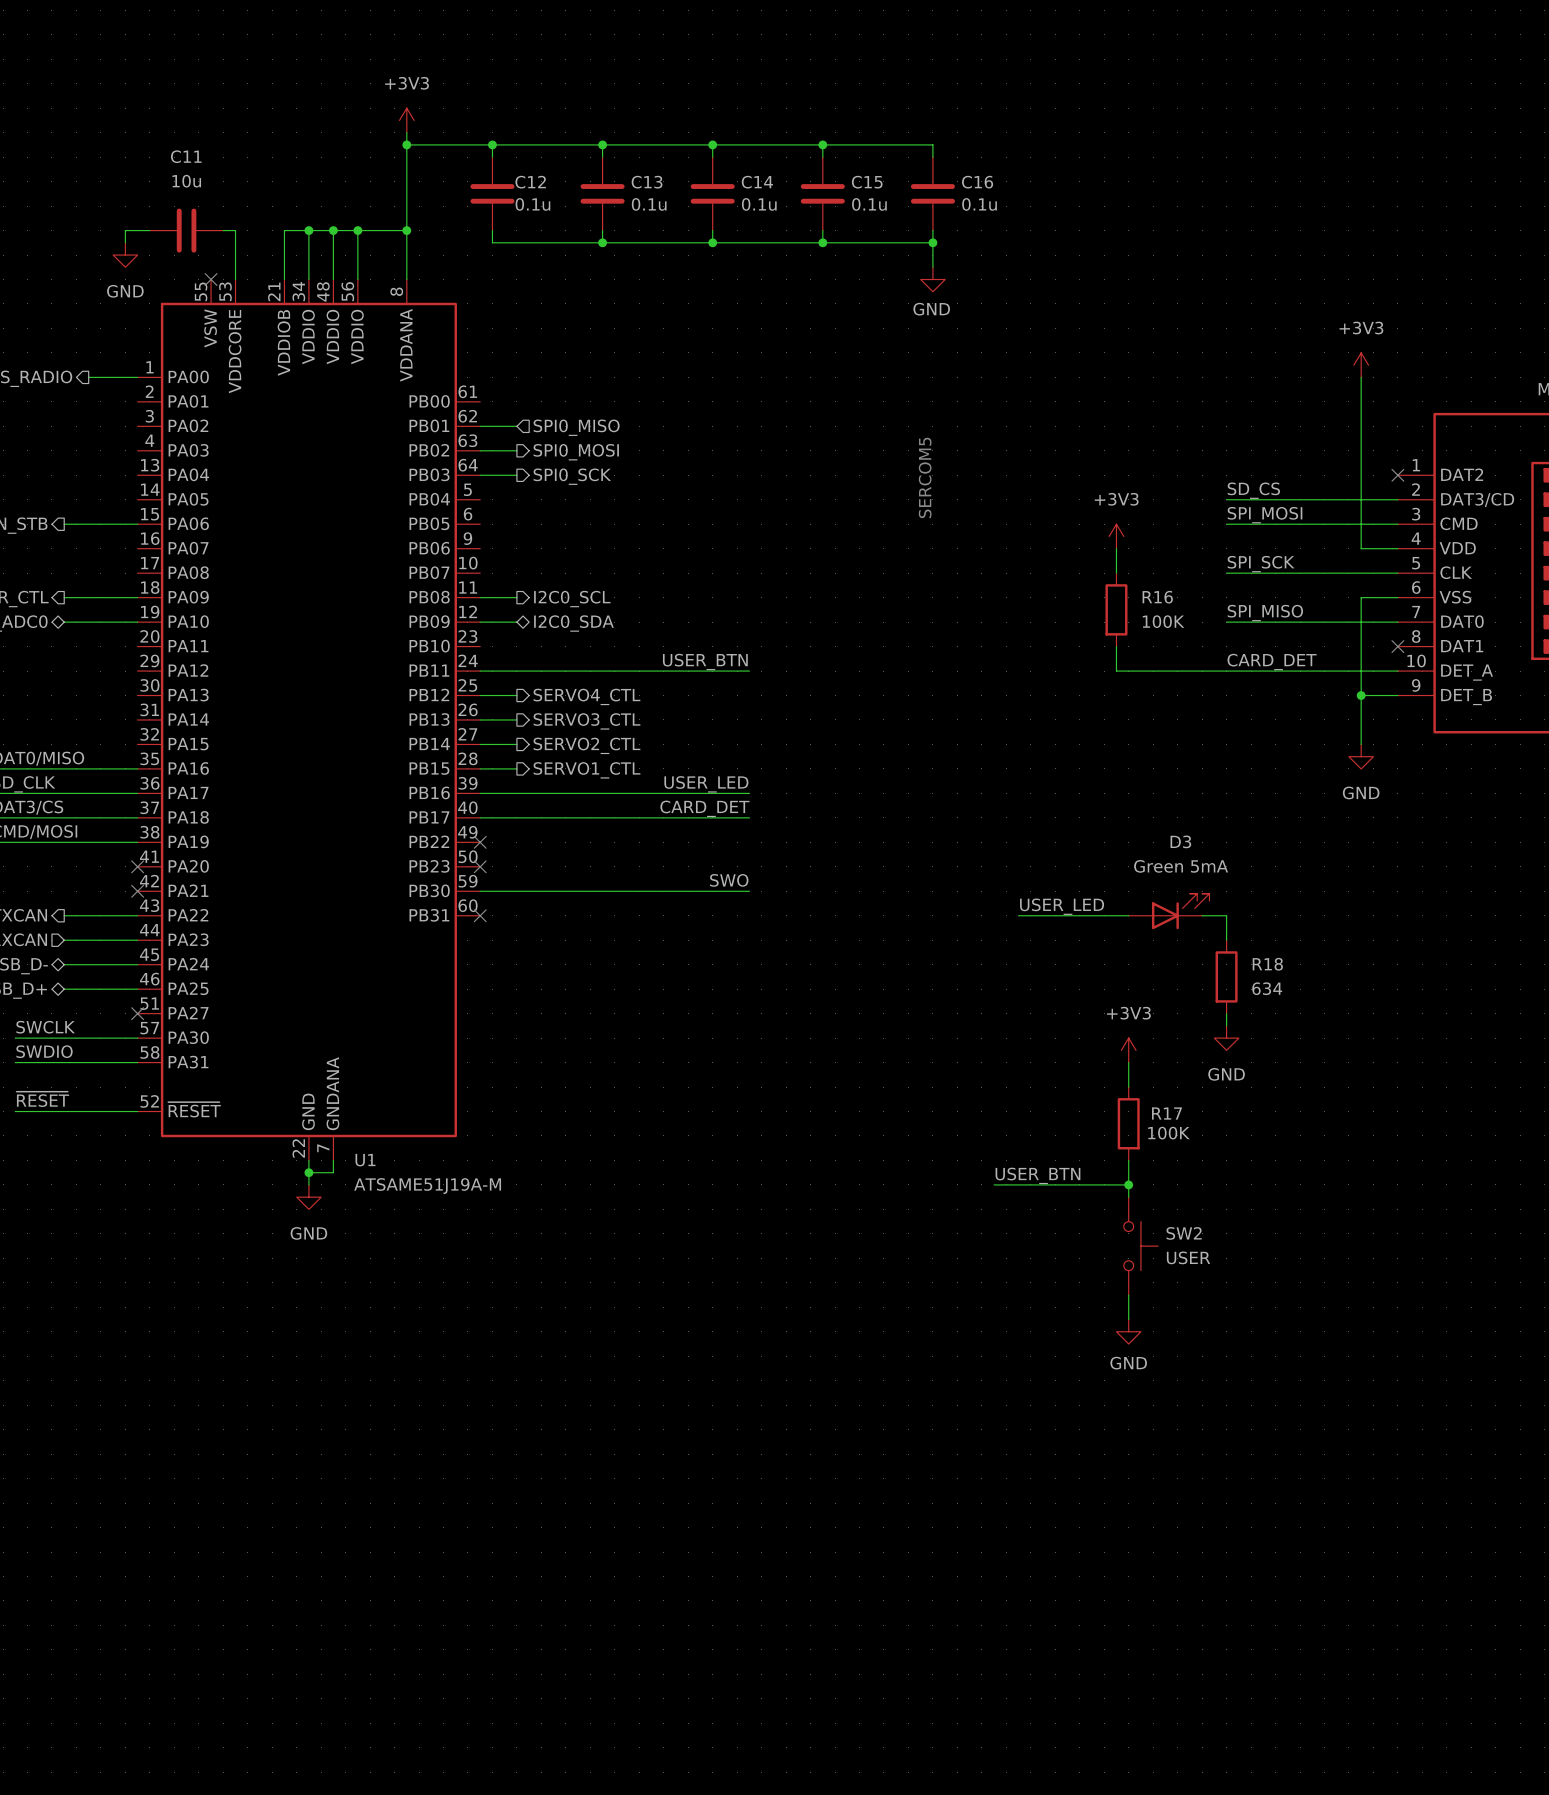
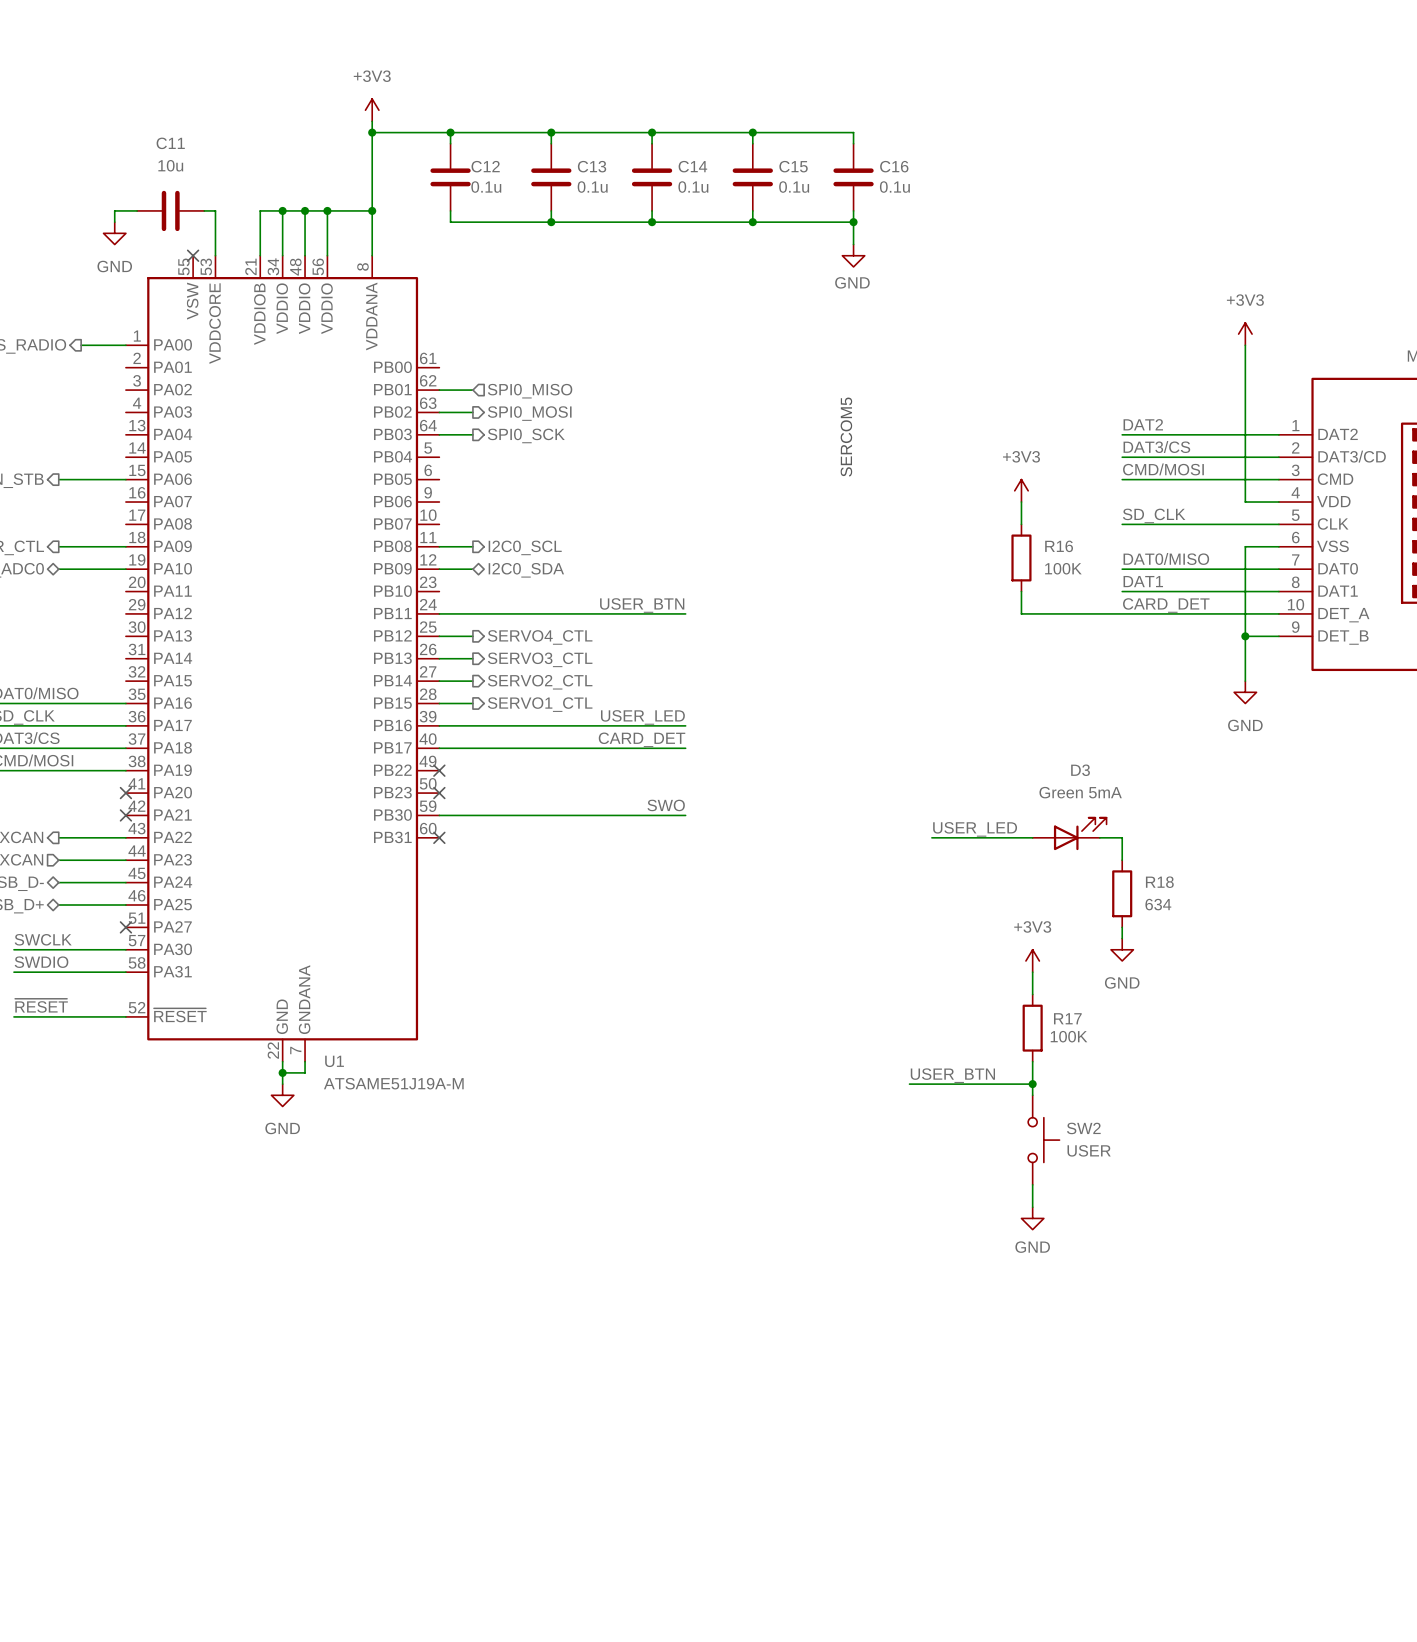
label: none -> DAT2 (1143, 424)
wire: none -> (1122, 434) (1278, 434)
no-connect mark: (1397, 475) -> none
label: SD_CS (1253, 490) -> DAT3/CS (1156, 447)
label: SPI_MOSI (1265, 515) -> CMD/MOSI (1163, 469)
label: SPI_SCK (1261, 564) -> SD_CLK (1154, 515)
label: SPI_MISO (1265, 613) -> DAT0/MISO (1166, 558)
label: none -> DAT1 (1143, 581)
wire: none -> (1122, 591) (1278, 591)
no-connect mark: (1397, 646) -> none

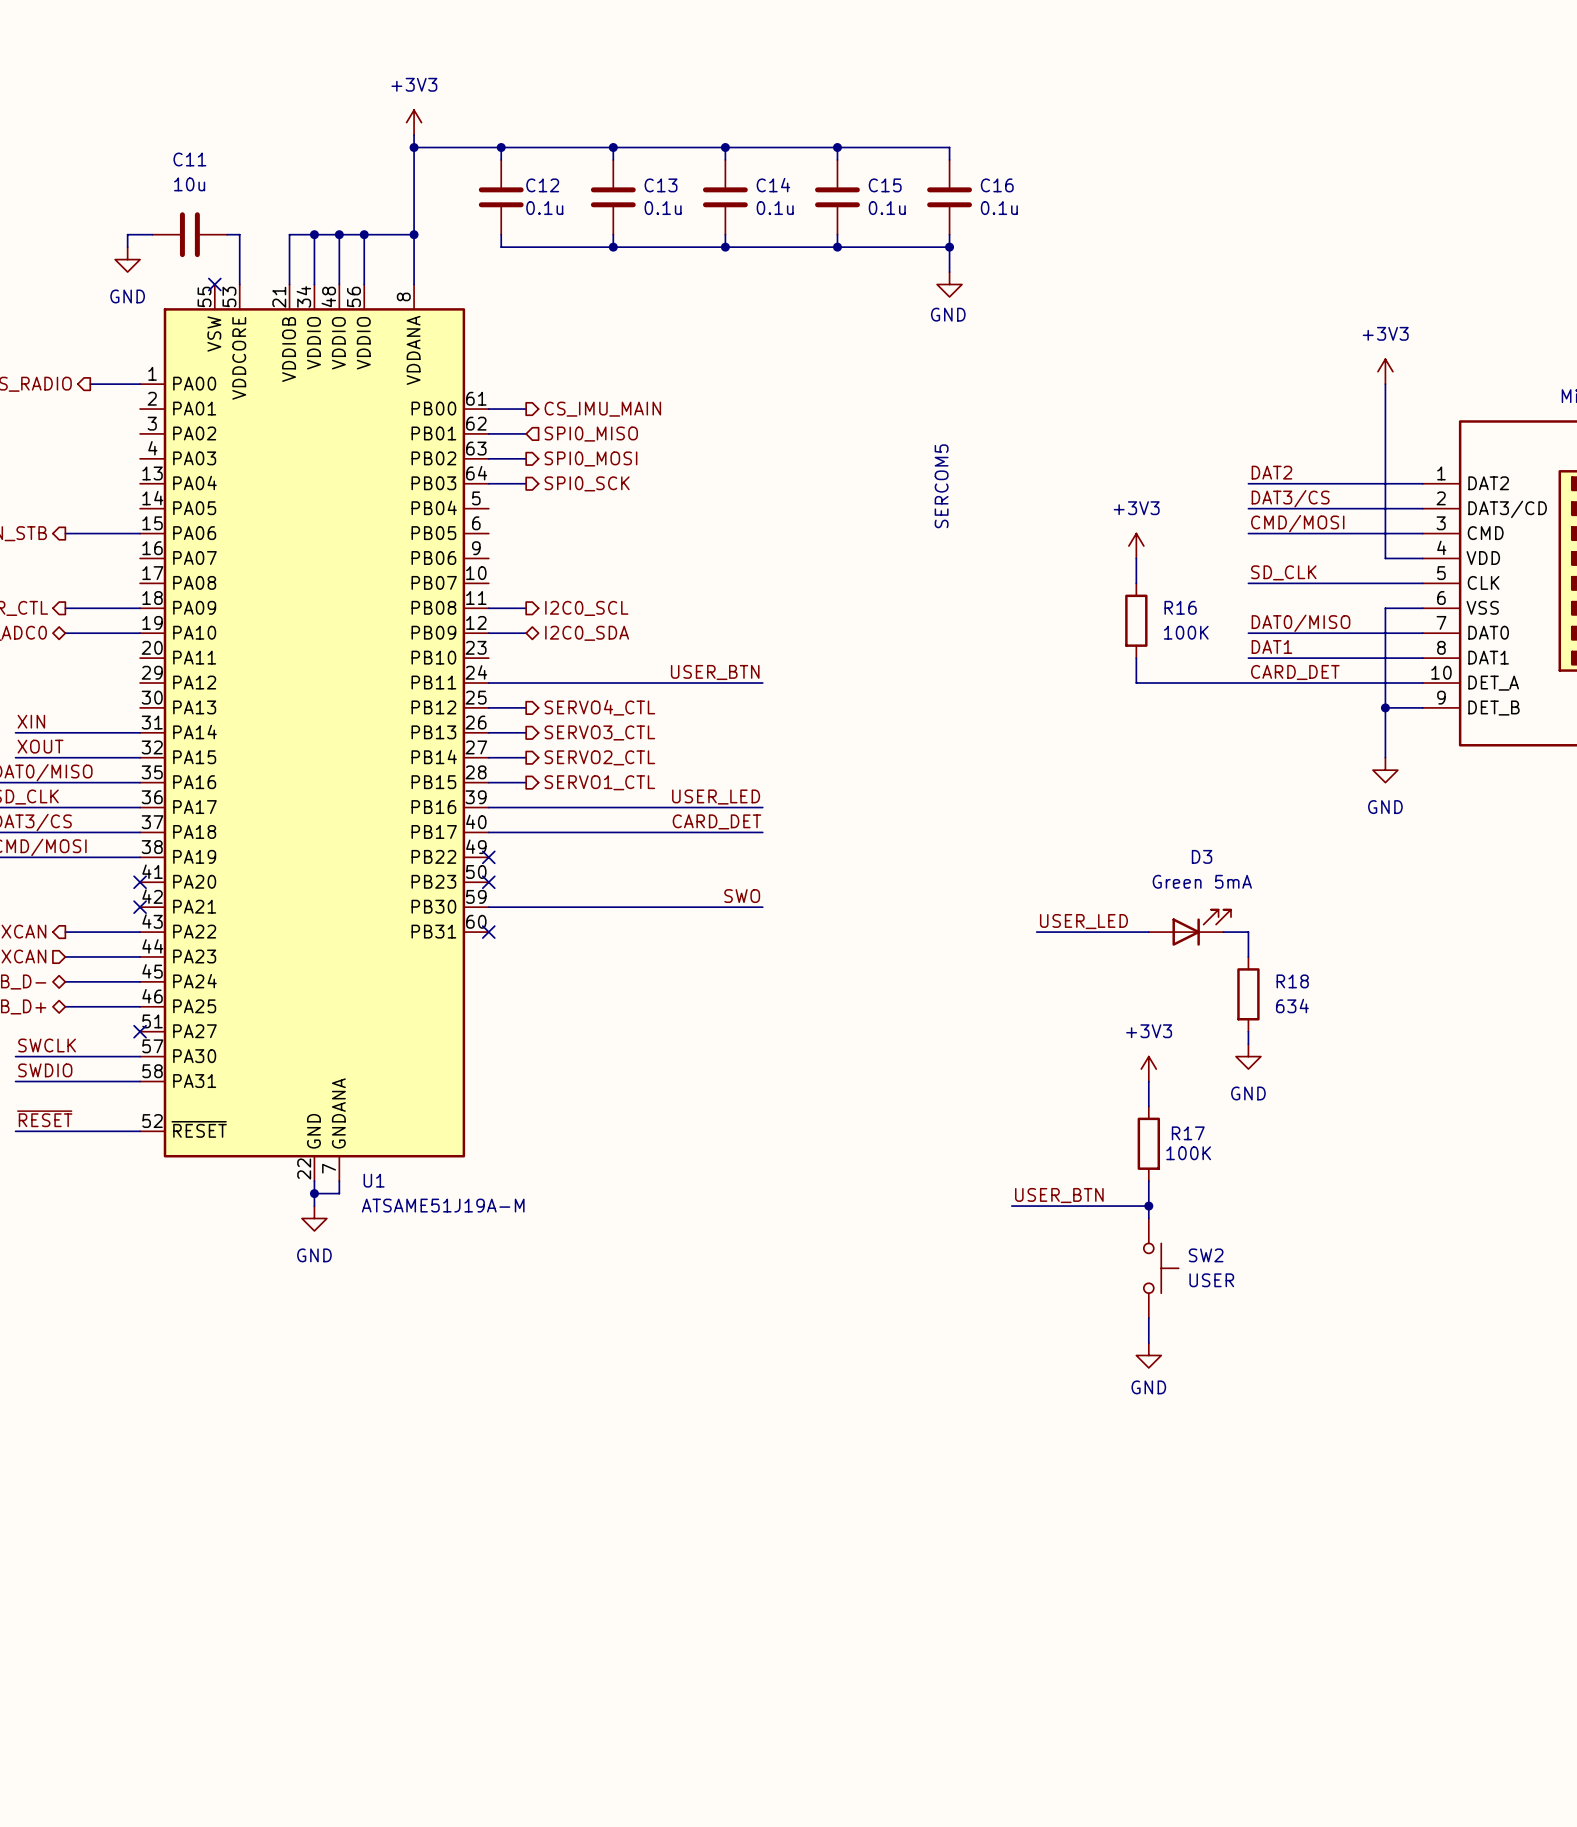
wire: none -> (488, 409) (526, 409)
hierarchical label: none -> CS_IMU_MAIN (602, 409)
label: none -> XIN (31, 721)
wire: none -> (15, 732) (140, 732)
label: none -> XOUT (40, 746)
wire: none -> (15, 757) (140, 757)

